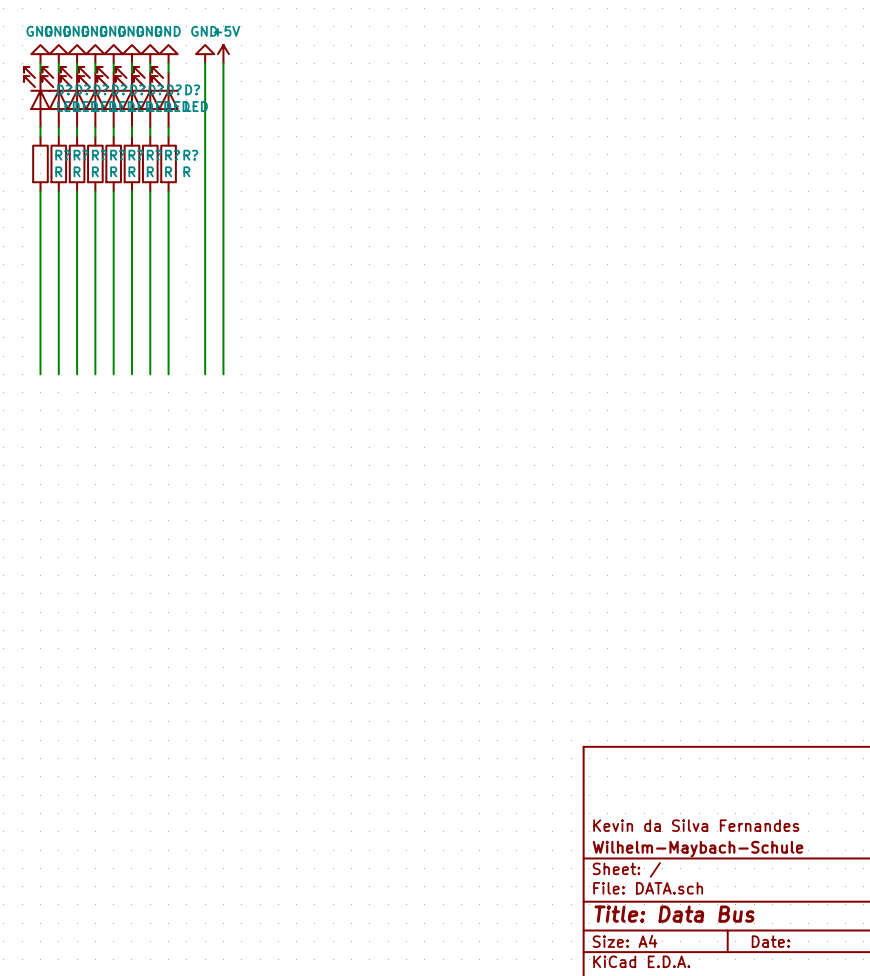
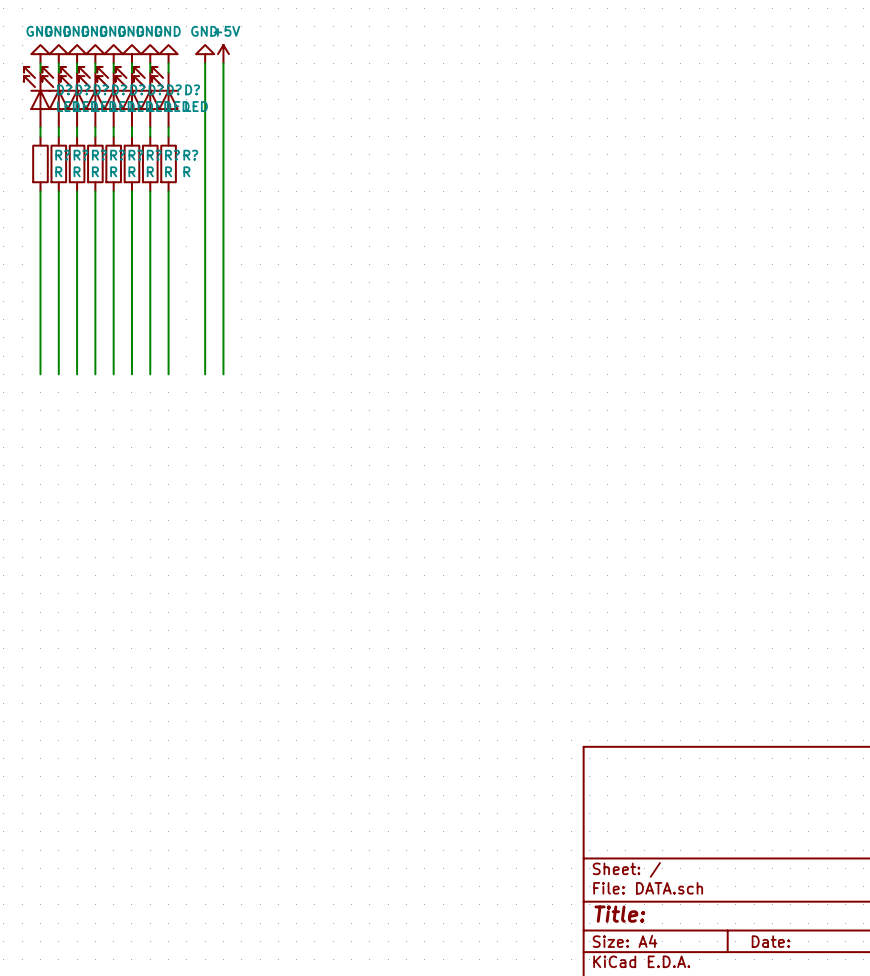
title block: Kevin da Silva Fernandes (696, 825) -> none
title block: Wilhelm-Maybach-Schule (698, 849) -> none
title block: Title: Data Bus (674, 914) -> Title: (619, 914)

